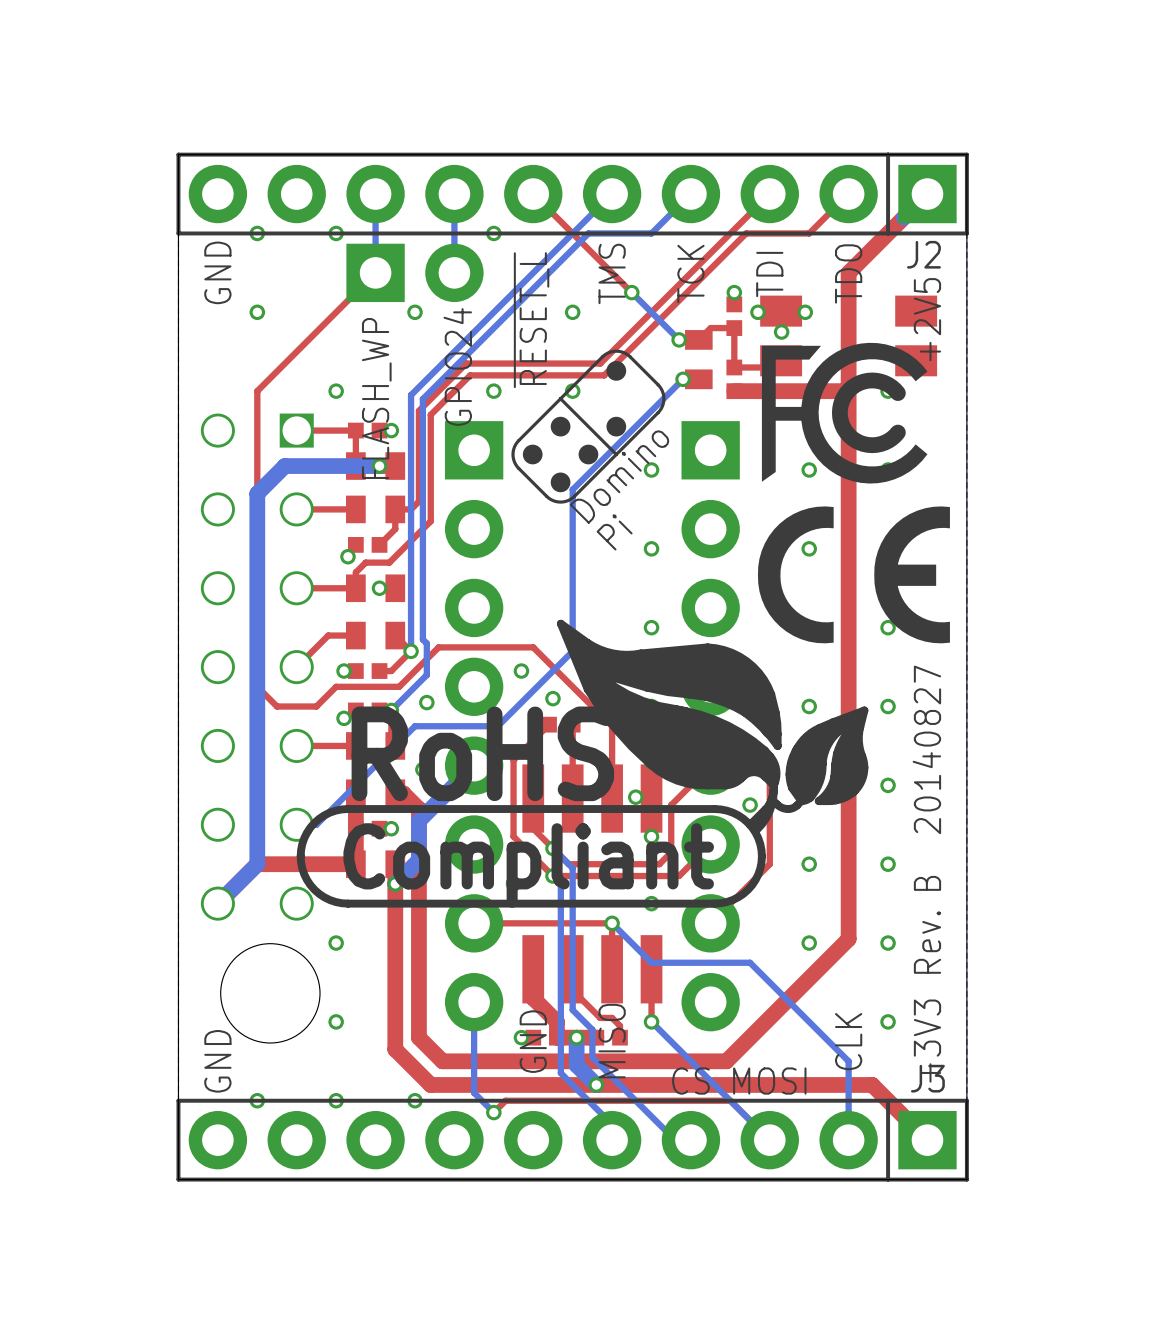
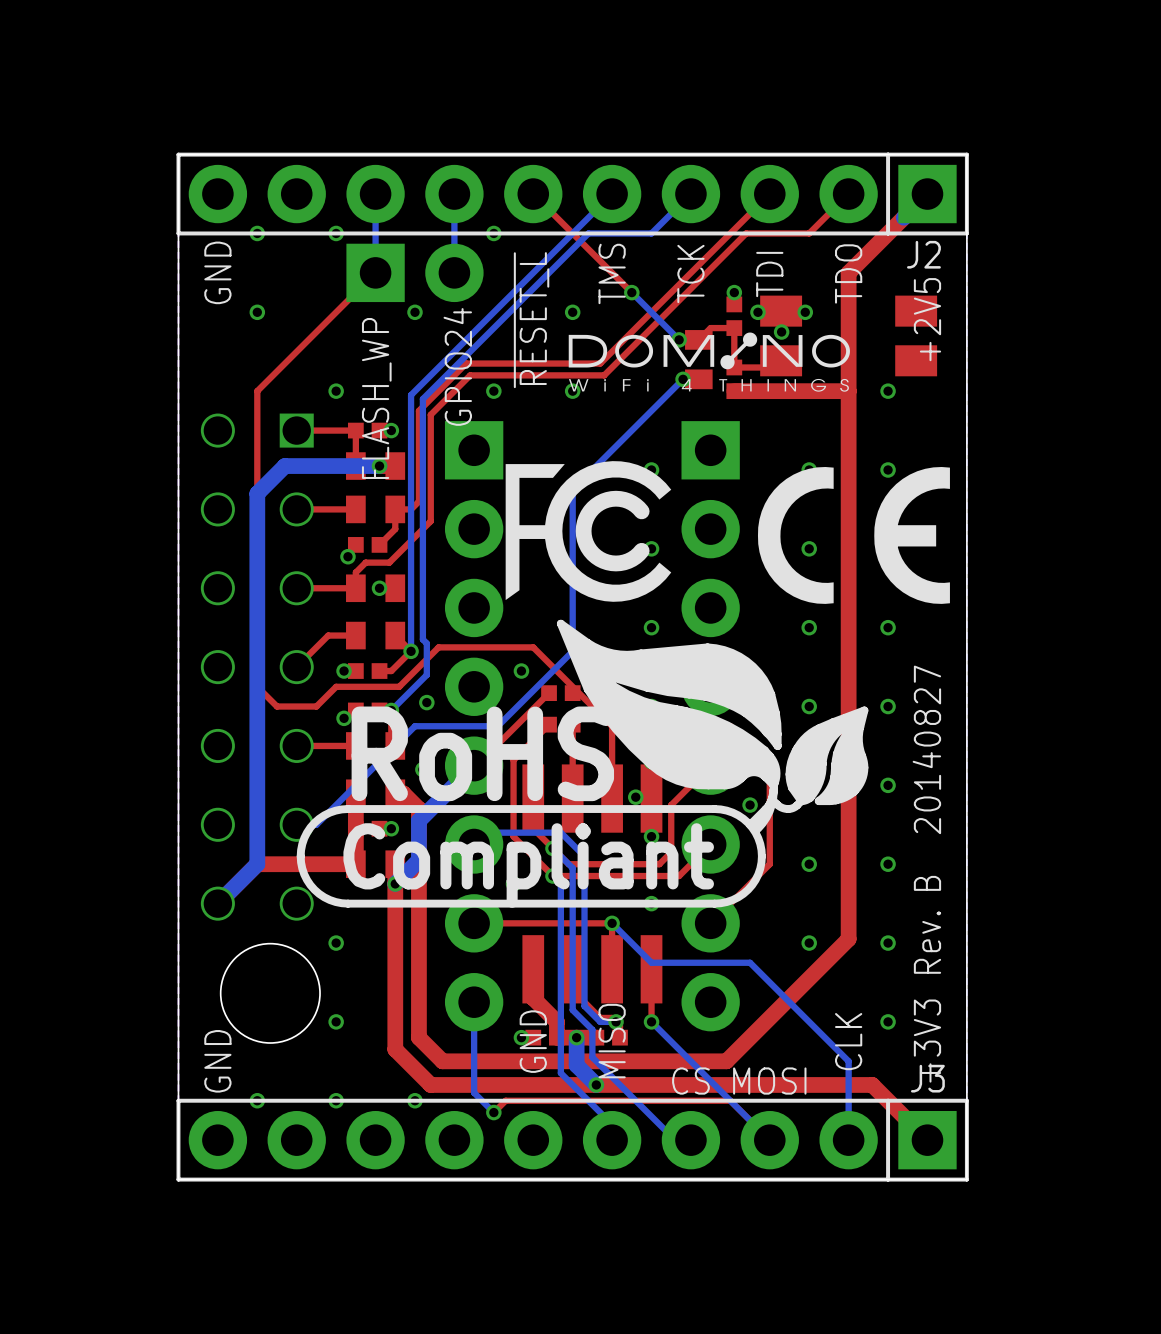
drawing: none -> [568, 332, 850, 392]
drawing: [511, 349, 666, 504] -> none
drawing position: (844, 413) -> (588, 531)
drawing position: (853, 574) -> (853, 535)
top track: none -> (549, 693) (476, 765) (474, 765)
part: none -> (560, 693)
via: (552, 698) -> none
bottom track: none -> (474, 844) (485, 832) (560, 832) (584, 856) (584, 1006) (600, 1021) (616, 1021)
via: none -> (616, 1021)

